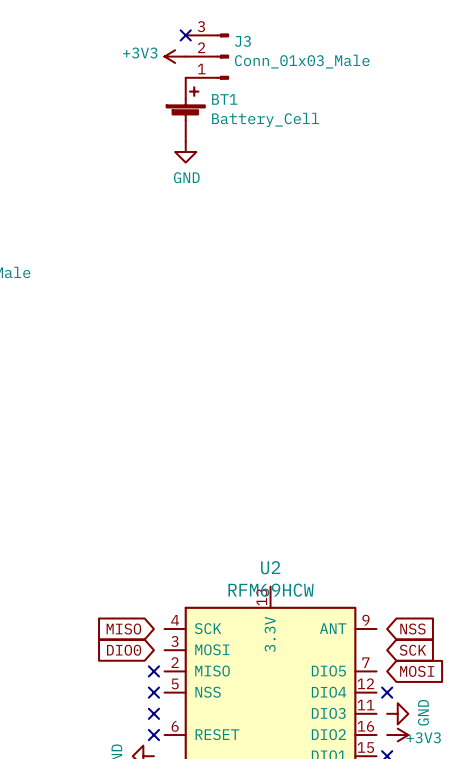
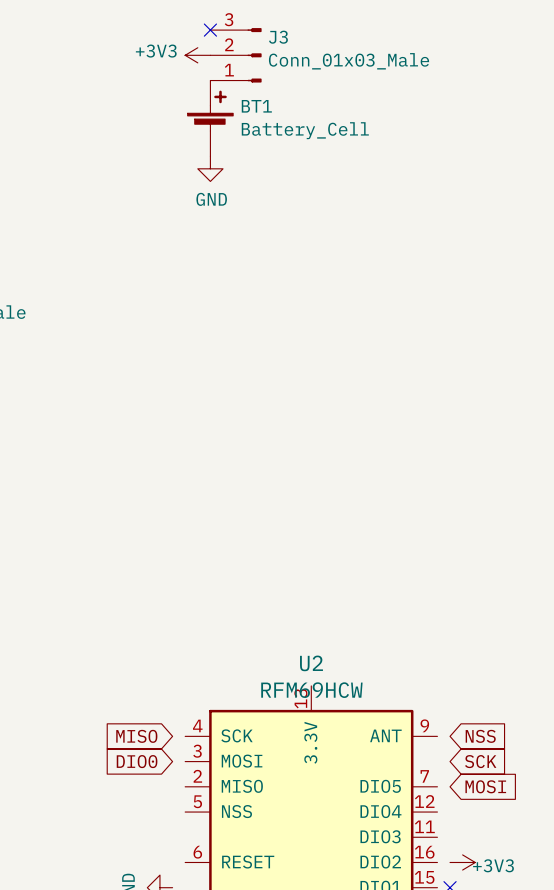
no-connect mark: (153, 671) -> none
no-connect mark: (153, 692) -> none
no-connect mark: (387, 692) -> none
no-connect mark: (153, 713) -> none
power symbol: GND (397, 713) -> none
no-connect mark: (153, 735) -> none

